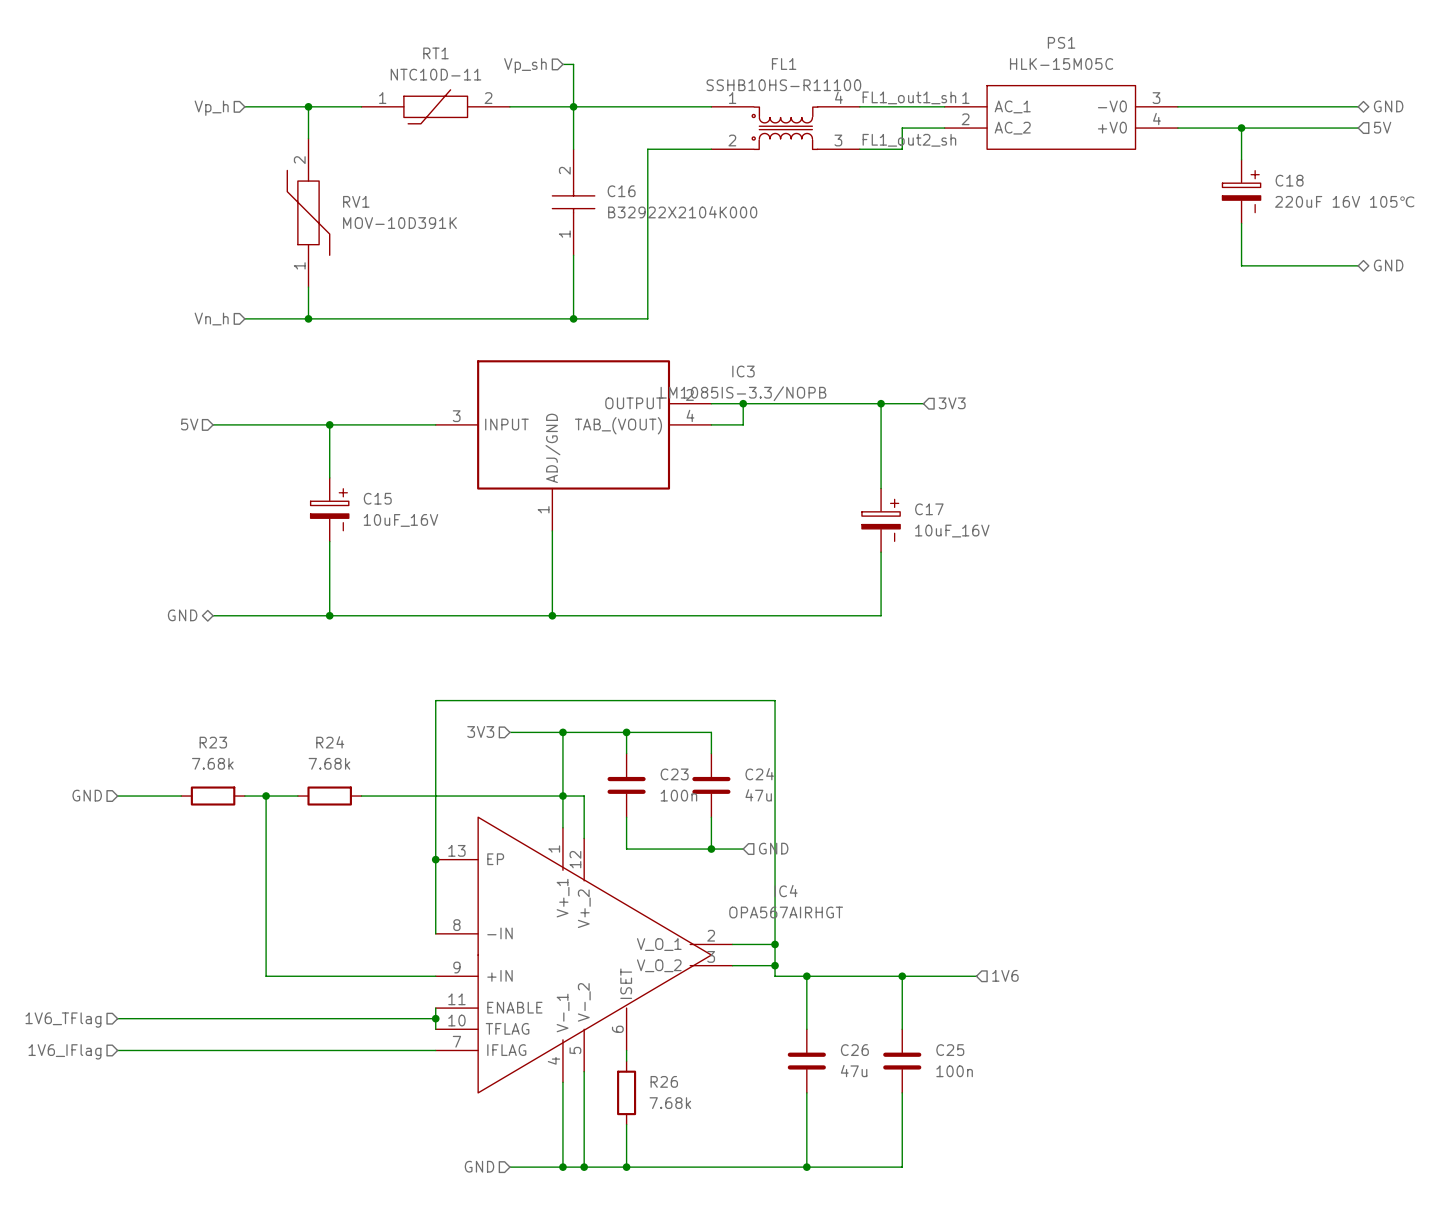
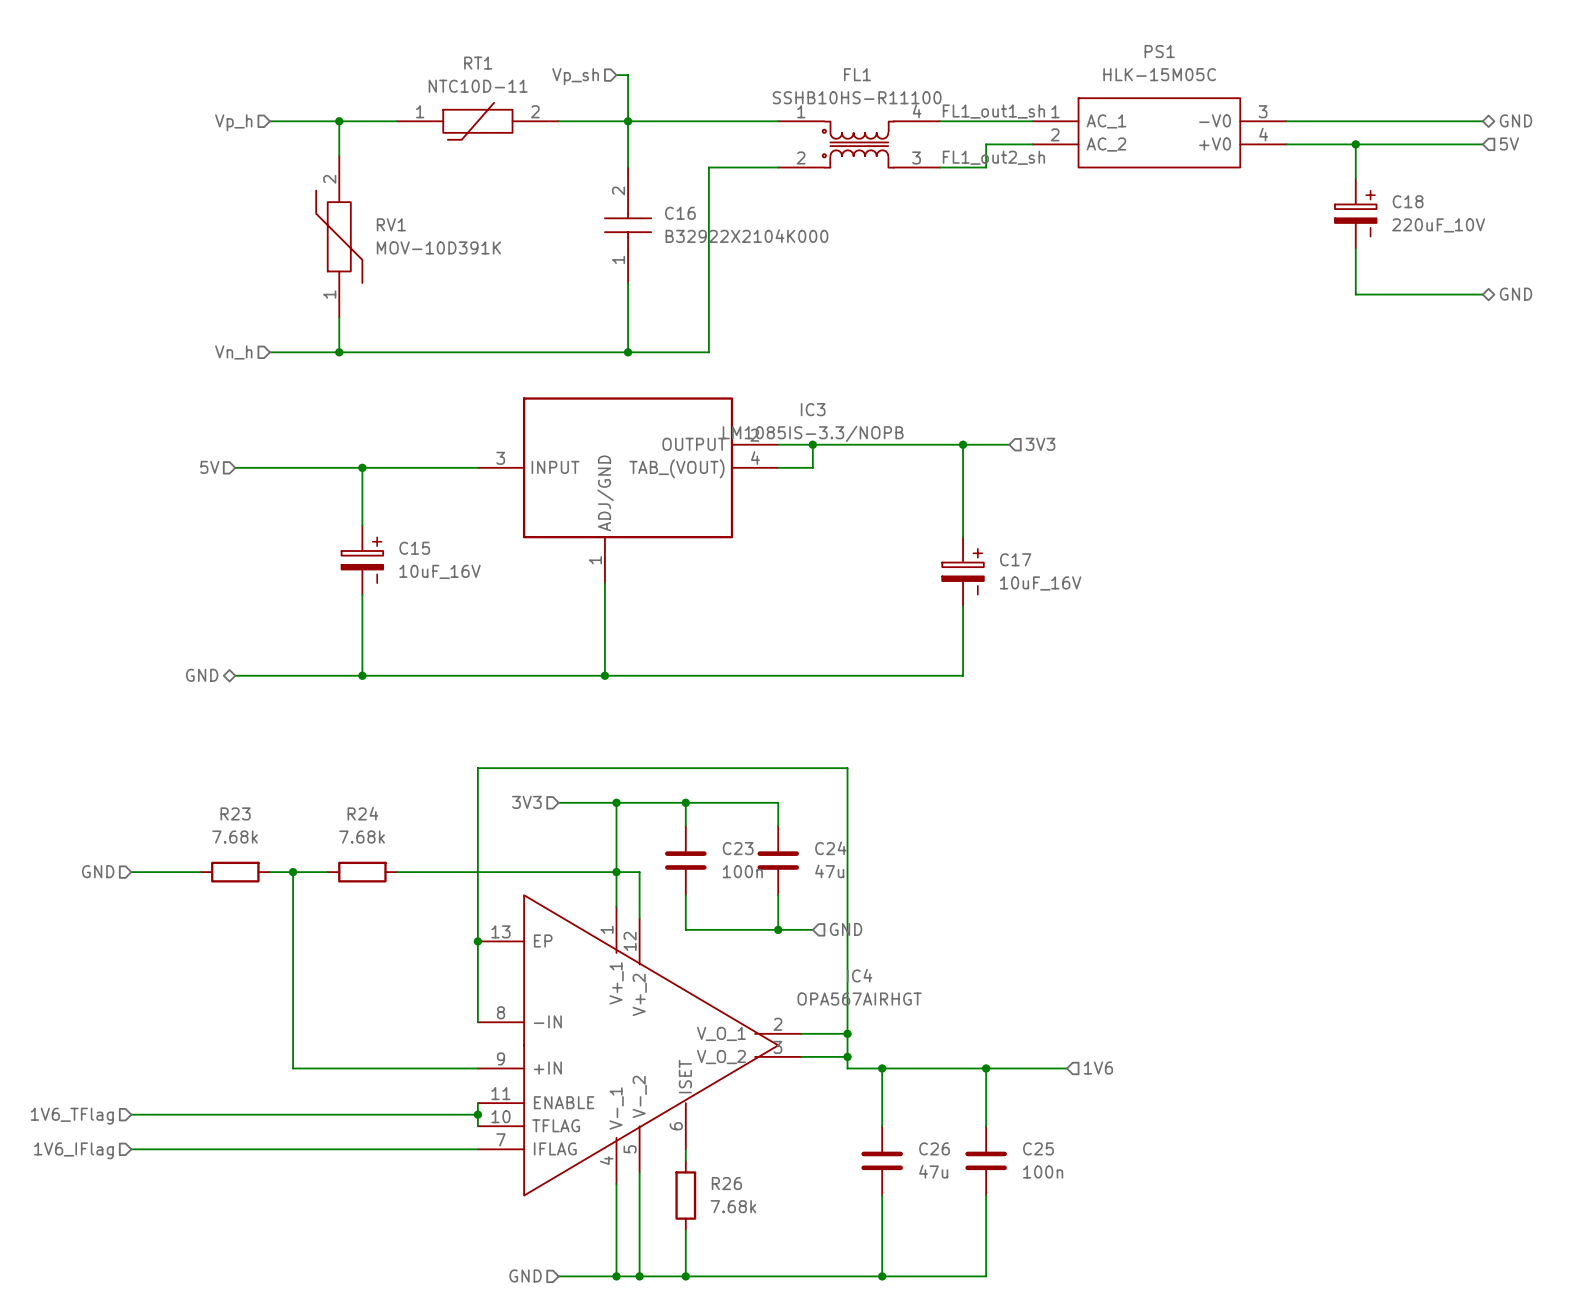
C18 value: 220uF 16V 105℃ (1344, 201) -> 220uF_10V (1438, 225)

